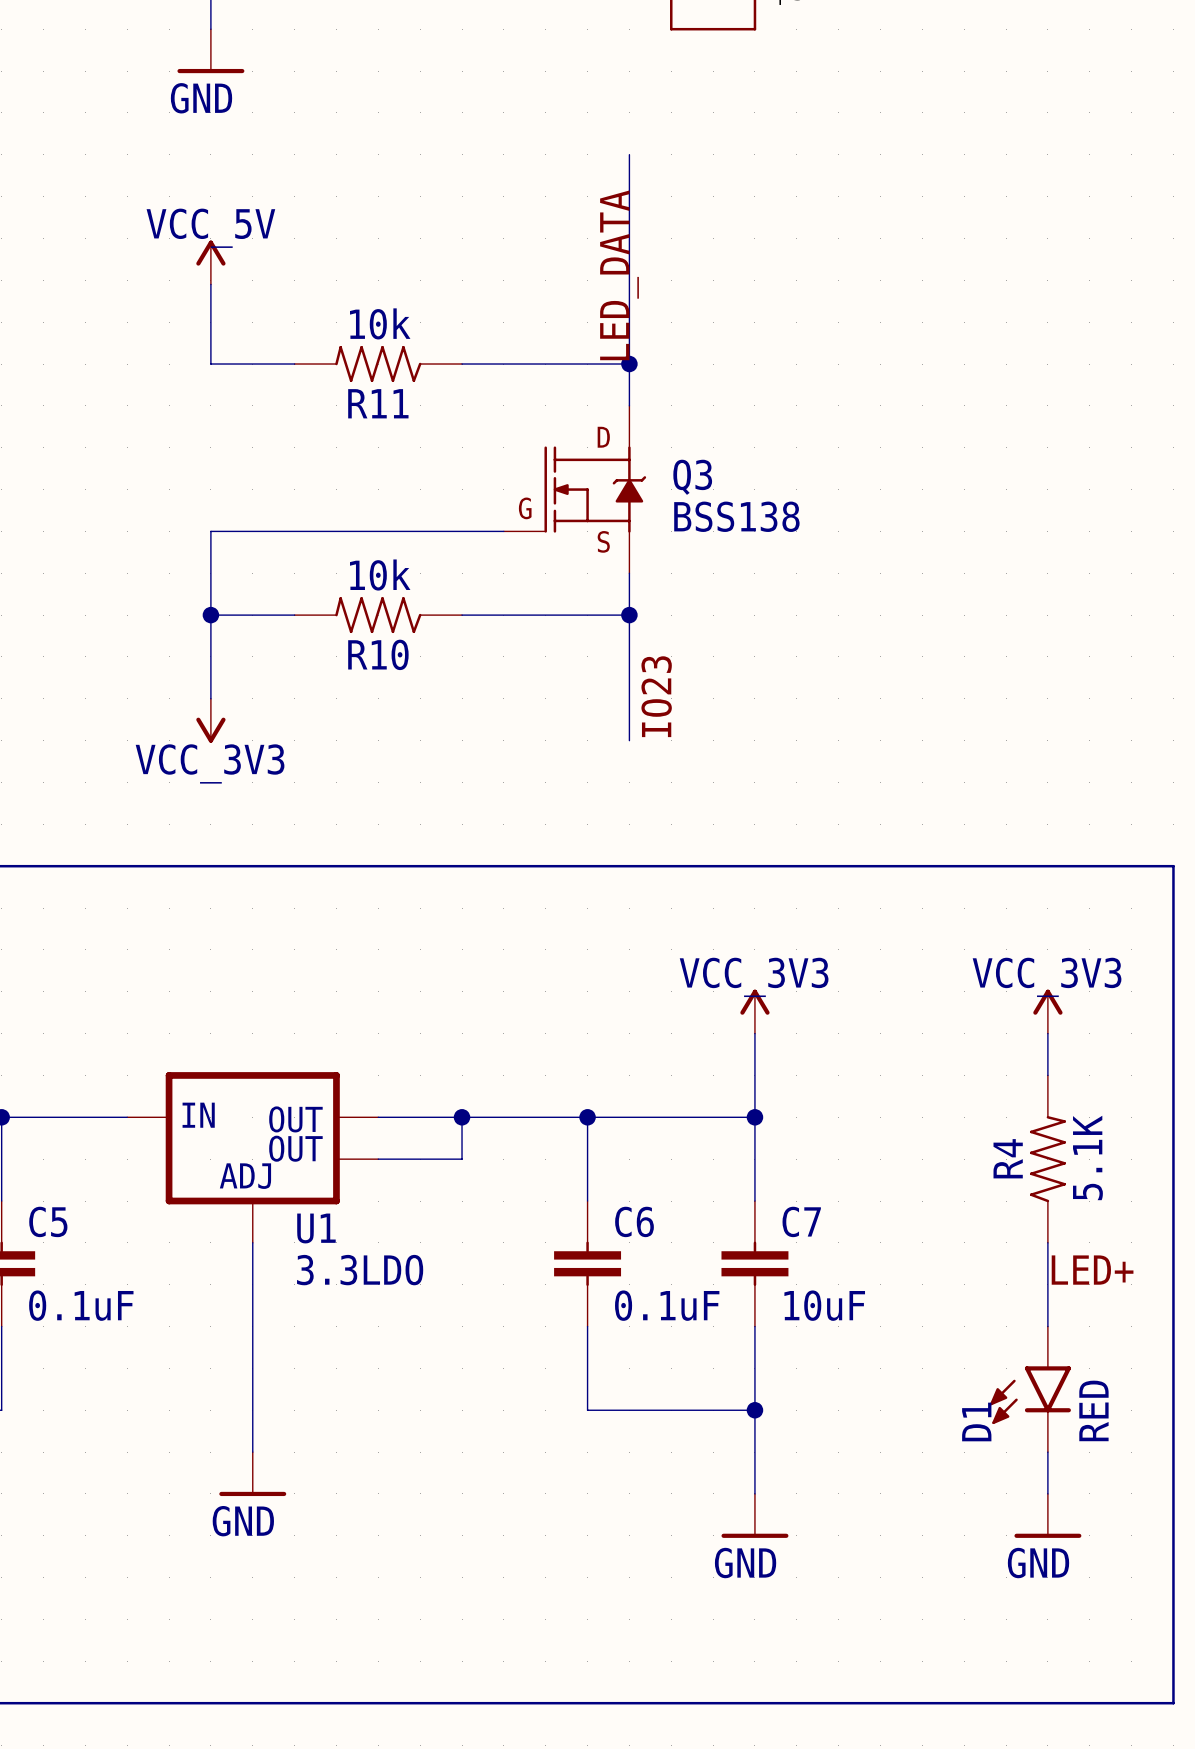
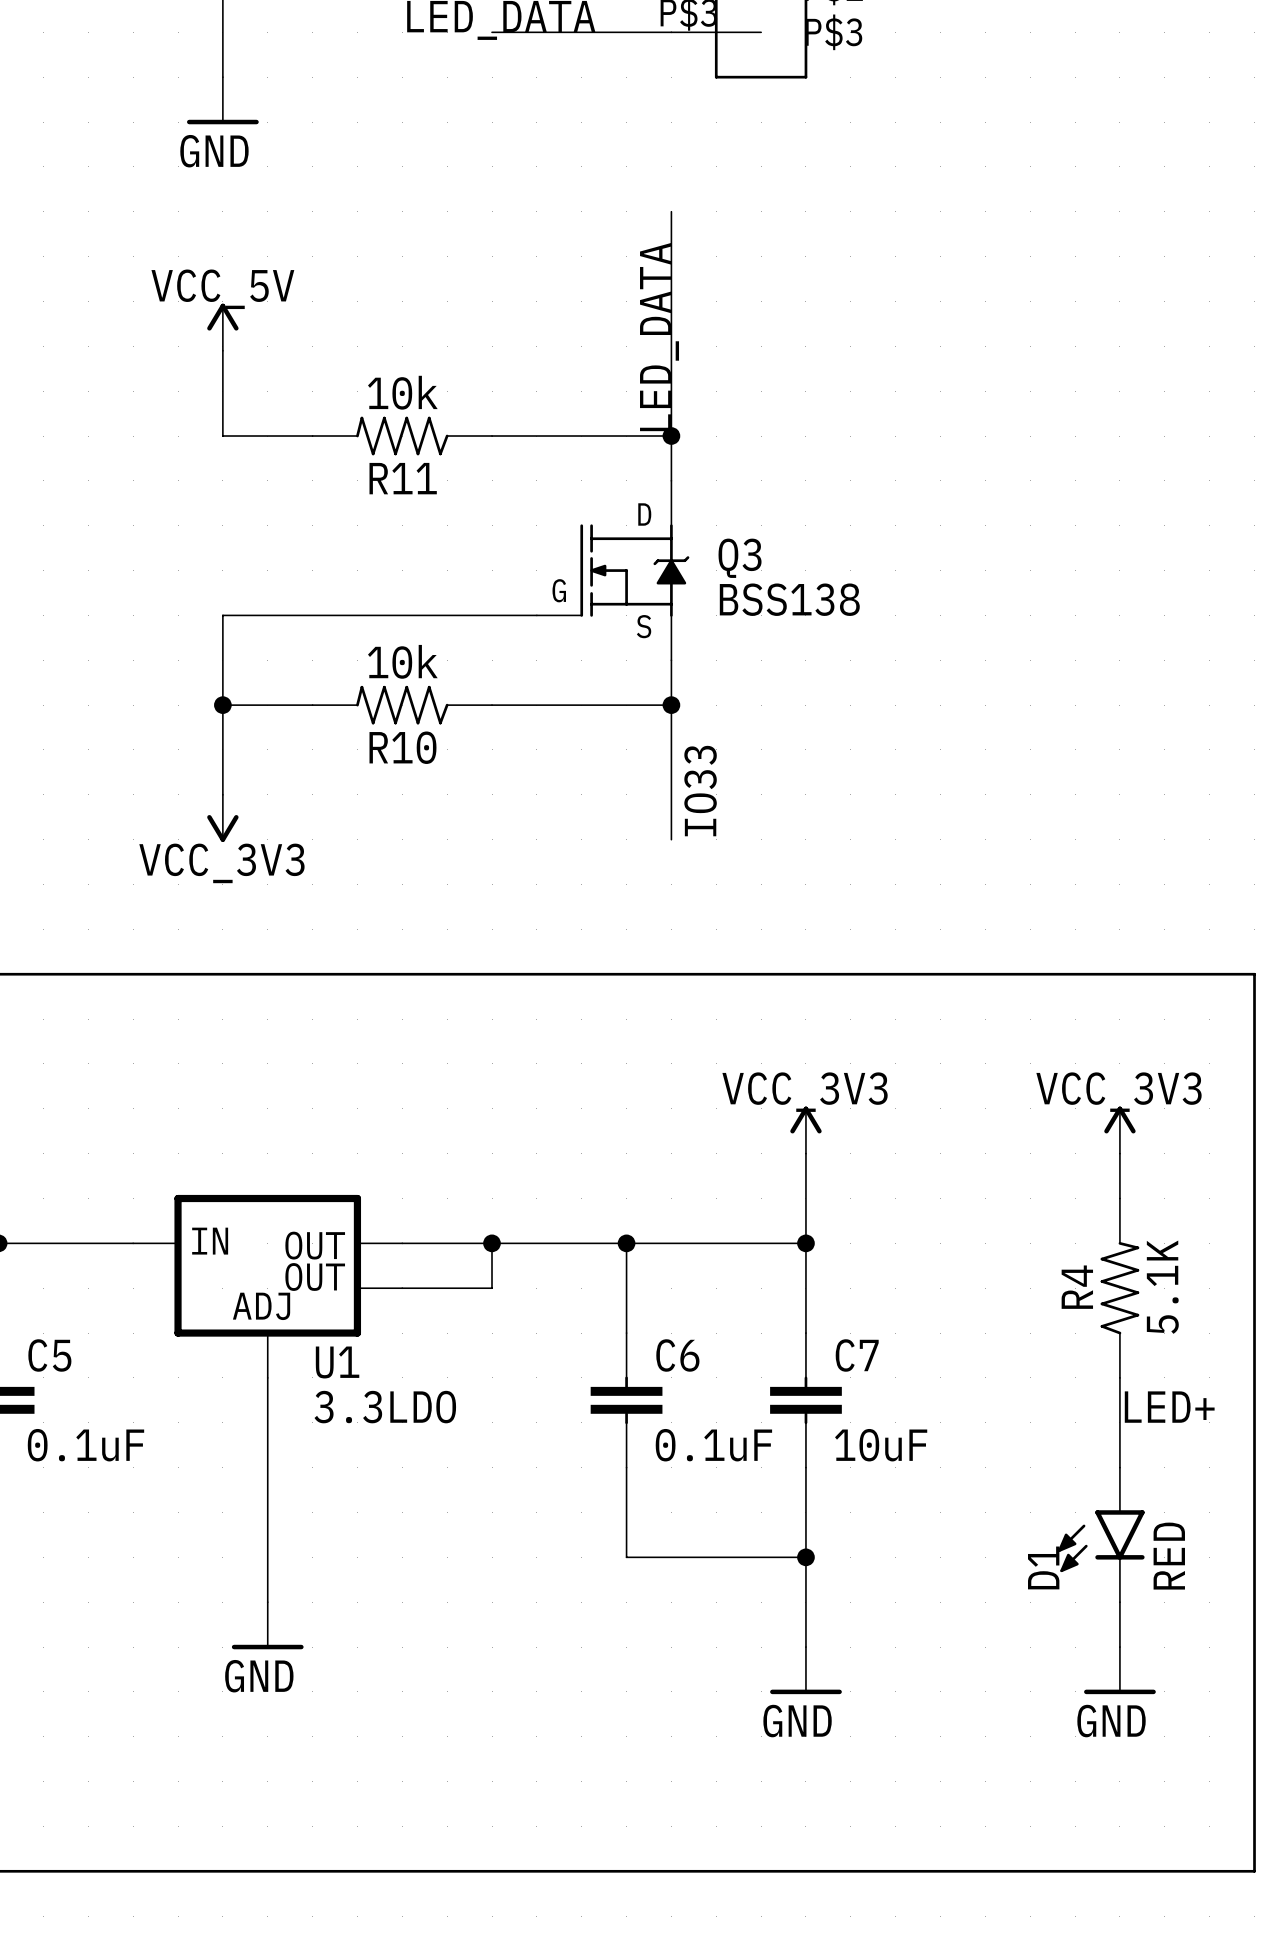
label: IO23 (656, 696) -> IO33 (700, 791)

